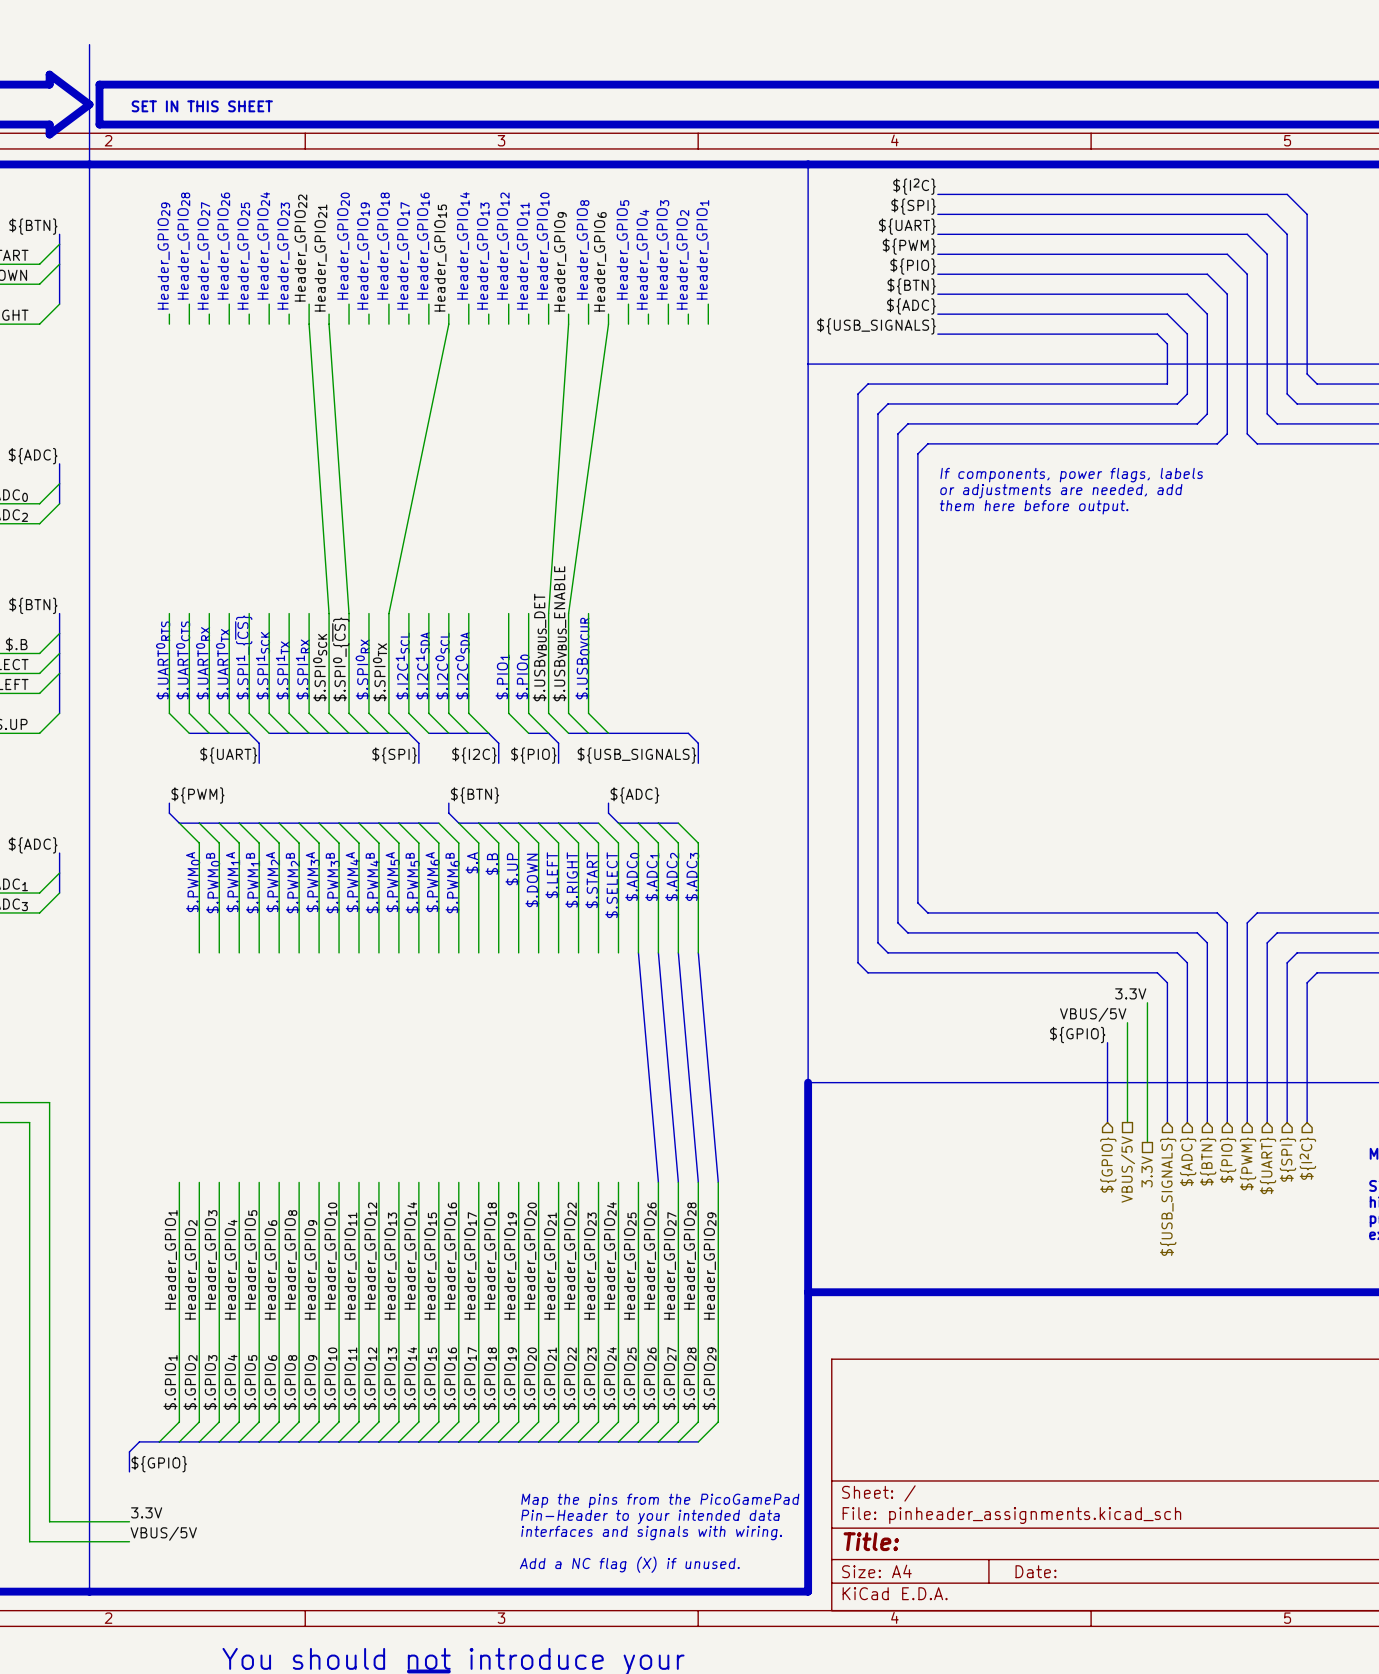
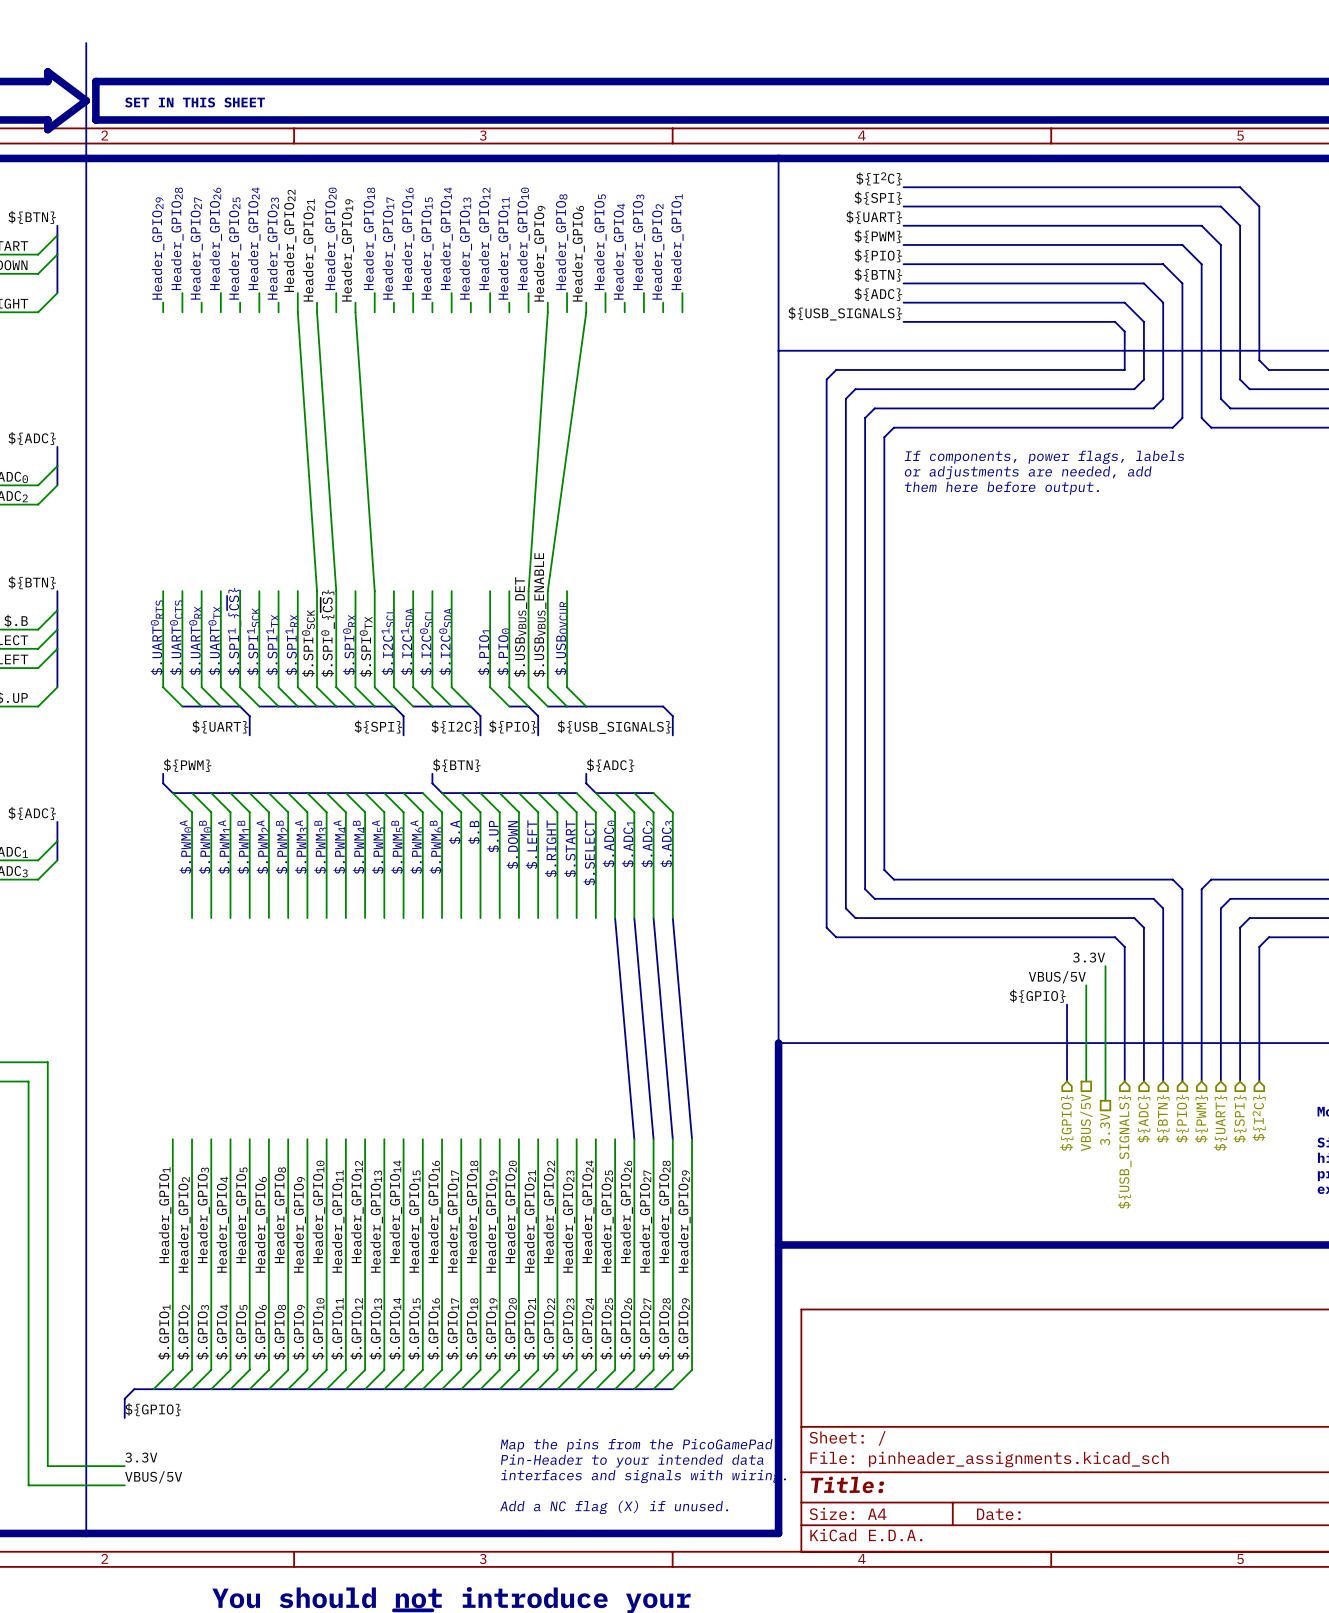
text: Header_GPIO19 (363, 256) -> none
text: none -> Header_GPIO15 (427, 248)
label: none -> Header_GPIO19 (347, 250)
label: Header_GPIO15 (440, 258) -> none
wire: (448, 324) (388, 613) -> (355, 312) (374, 591)

